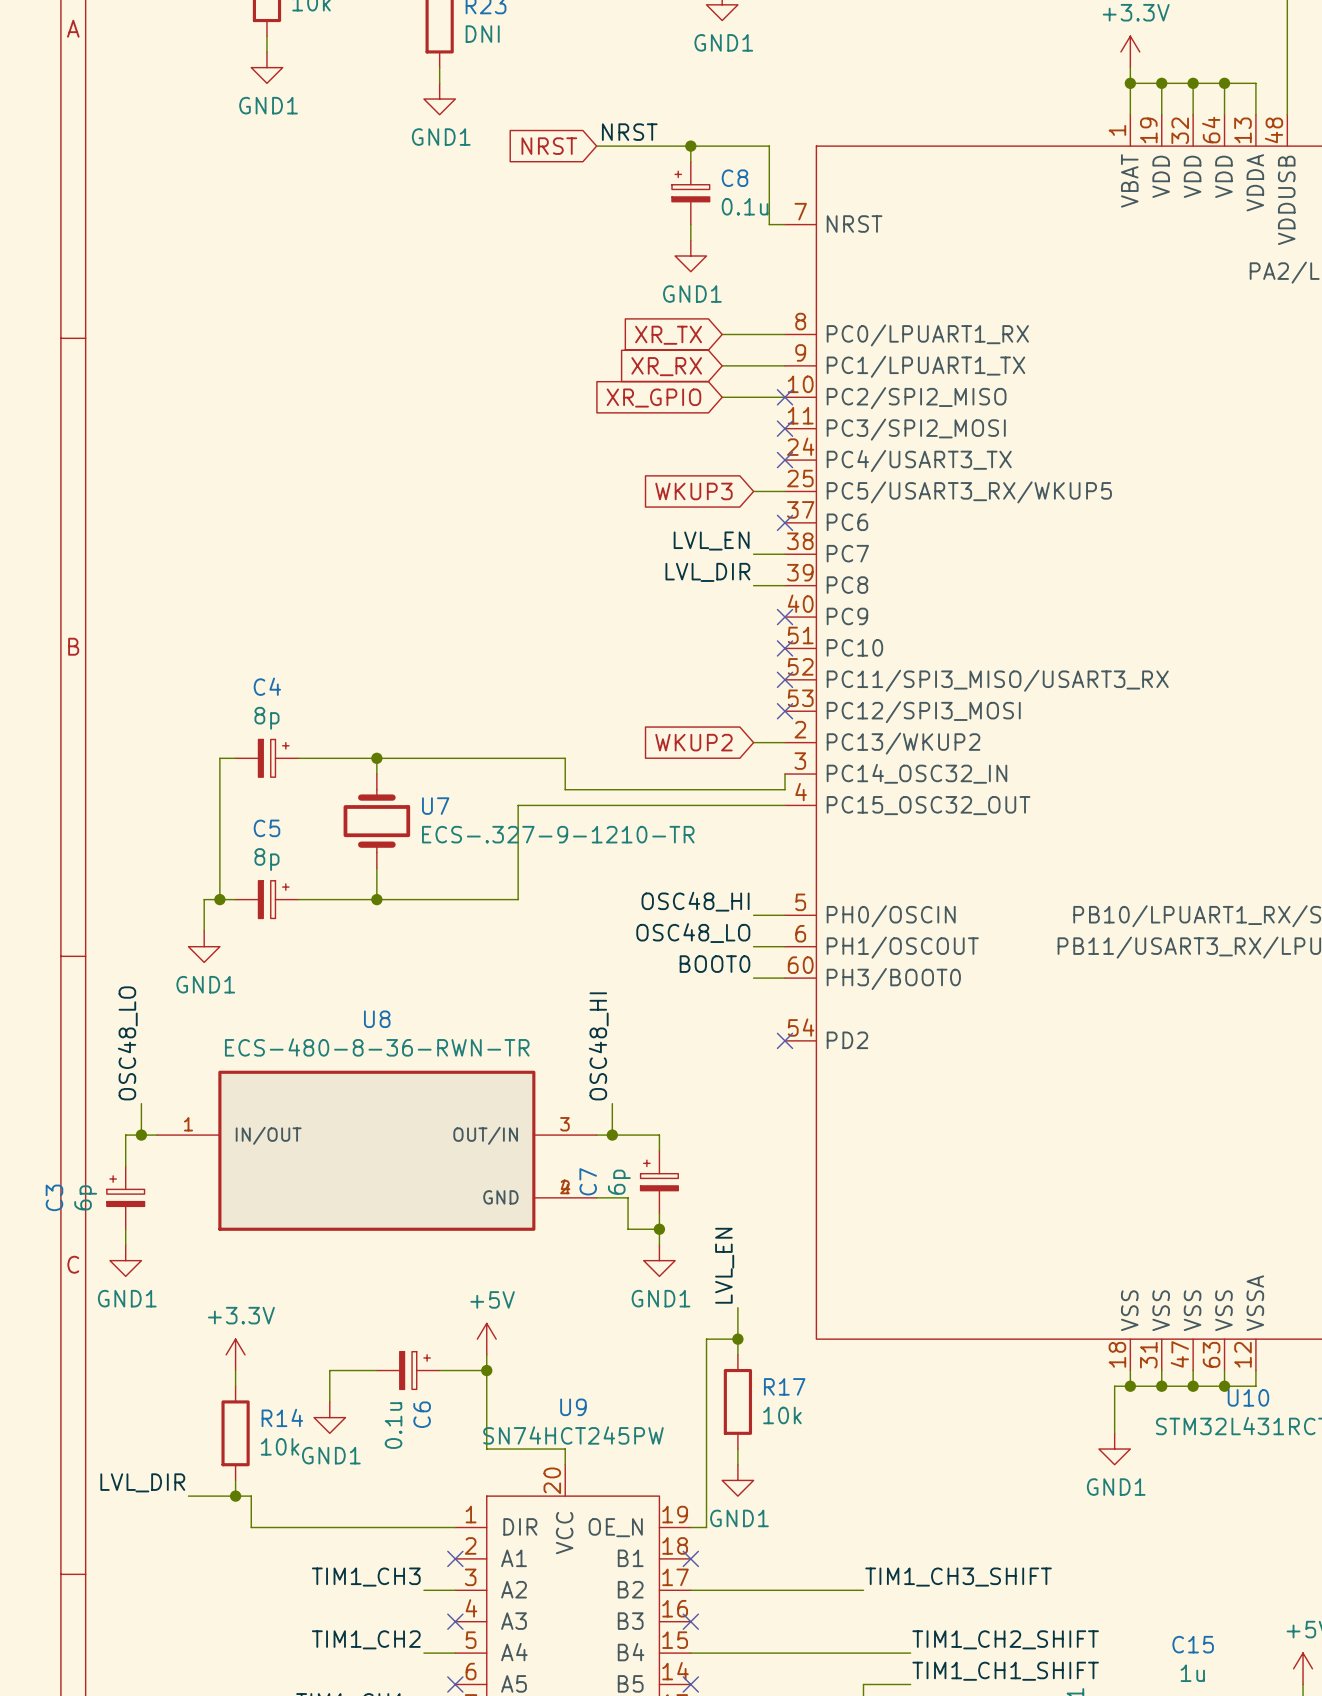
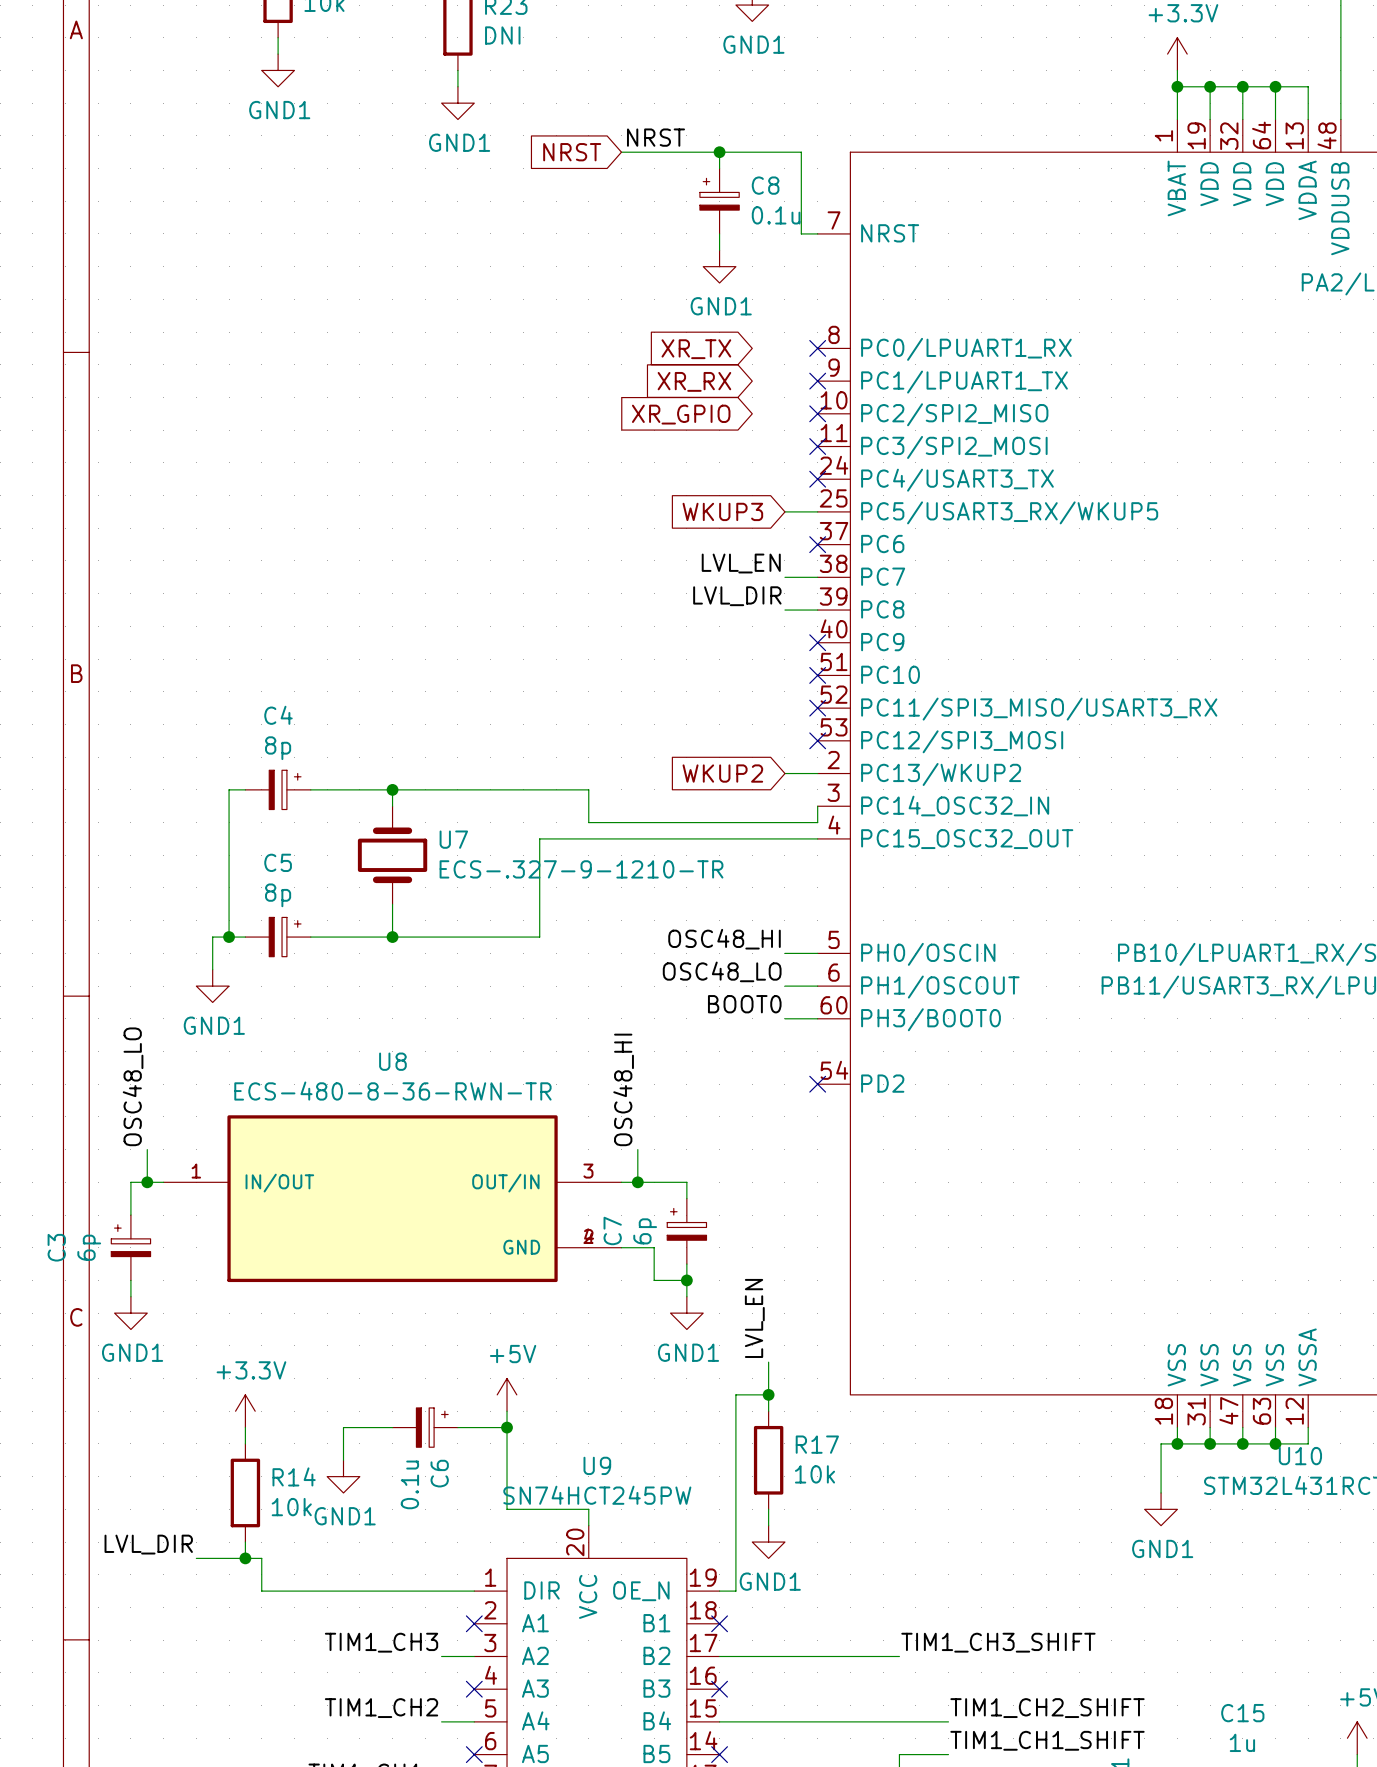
wire: (722, 334) (785, 334) -> none
no-connect mark: none -> (817, 348)
wire: (722, 365) (785, 365) -> none
no-connect mark: none -> (817, 381)
wire: (722, 397) (785, 397) -> none

